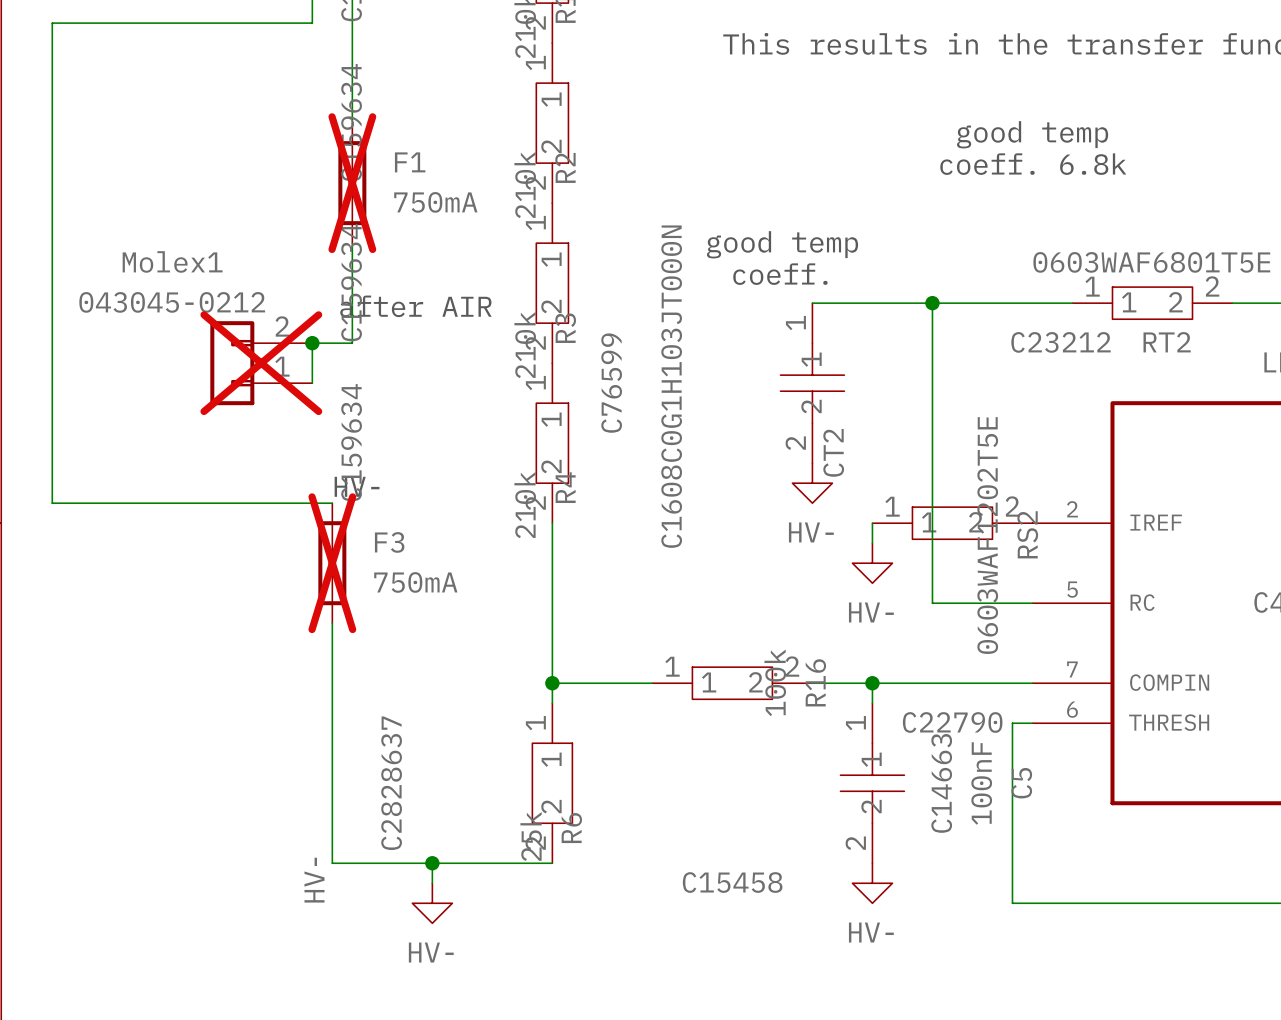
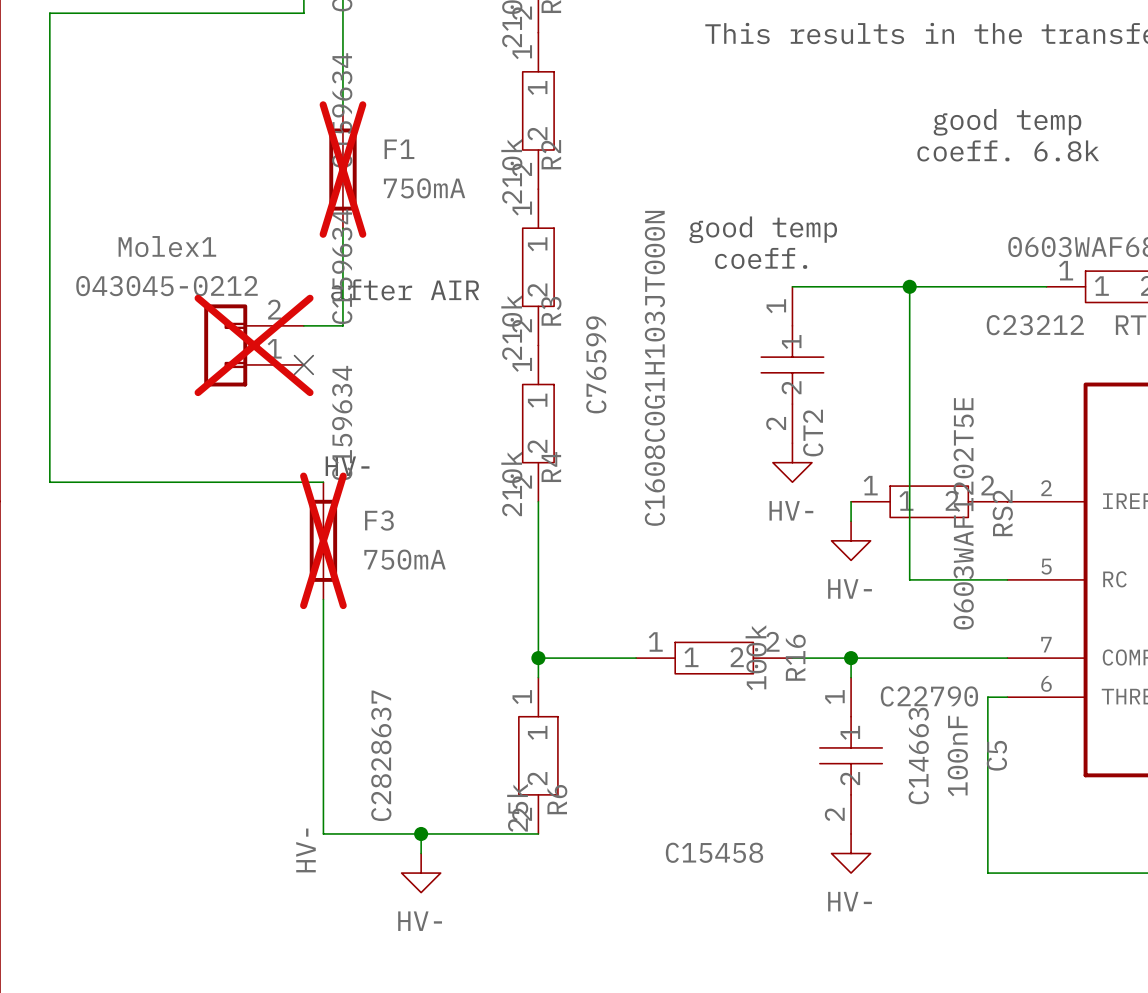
wire: (312, 343) (312, 383) -> none
junction: (312, 343) -> none
no-connect mark: none -> (303, 364)

